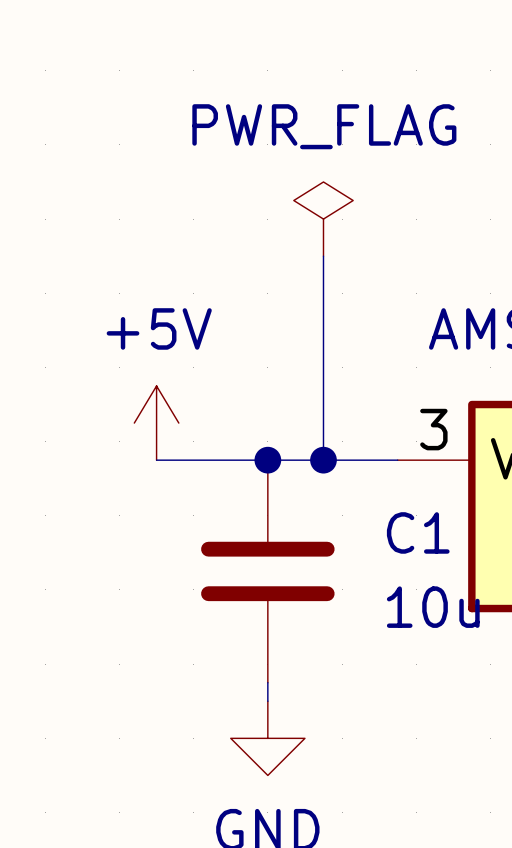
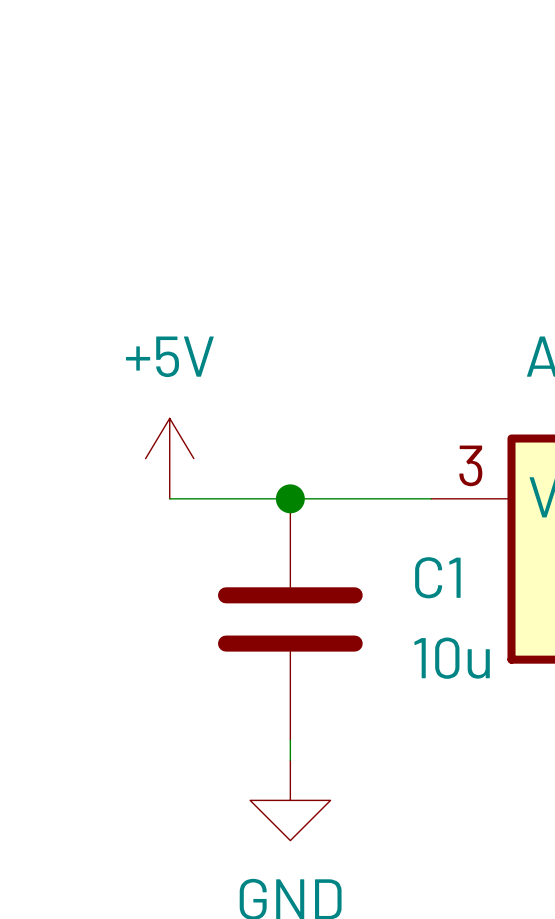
power symbol: PWR_FLAG (323, 219) -> none
wire: (323, 256) (323, 460) -> none
junction: (323, 460) -> none

